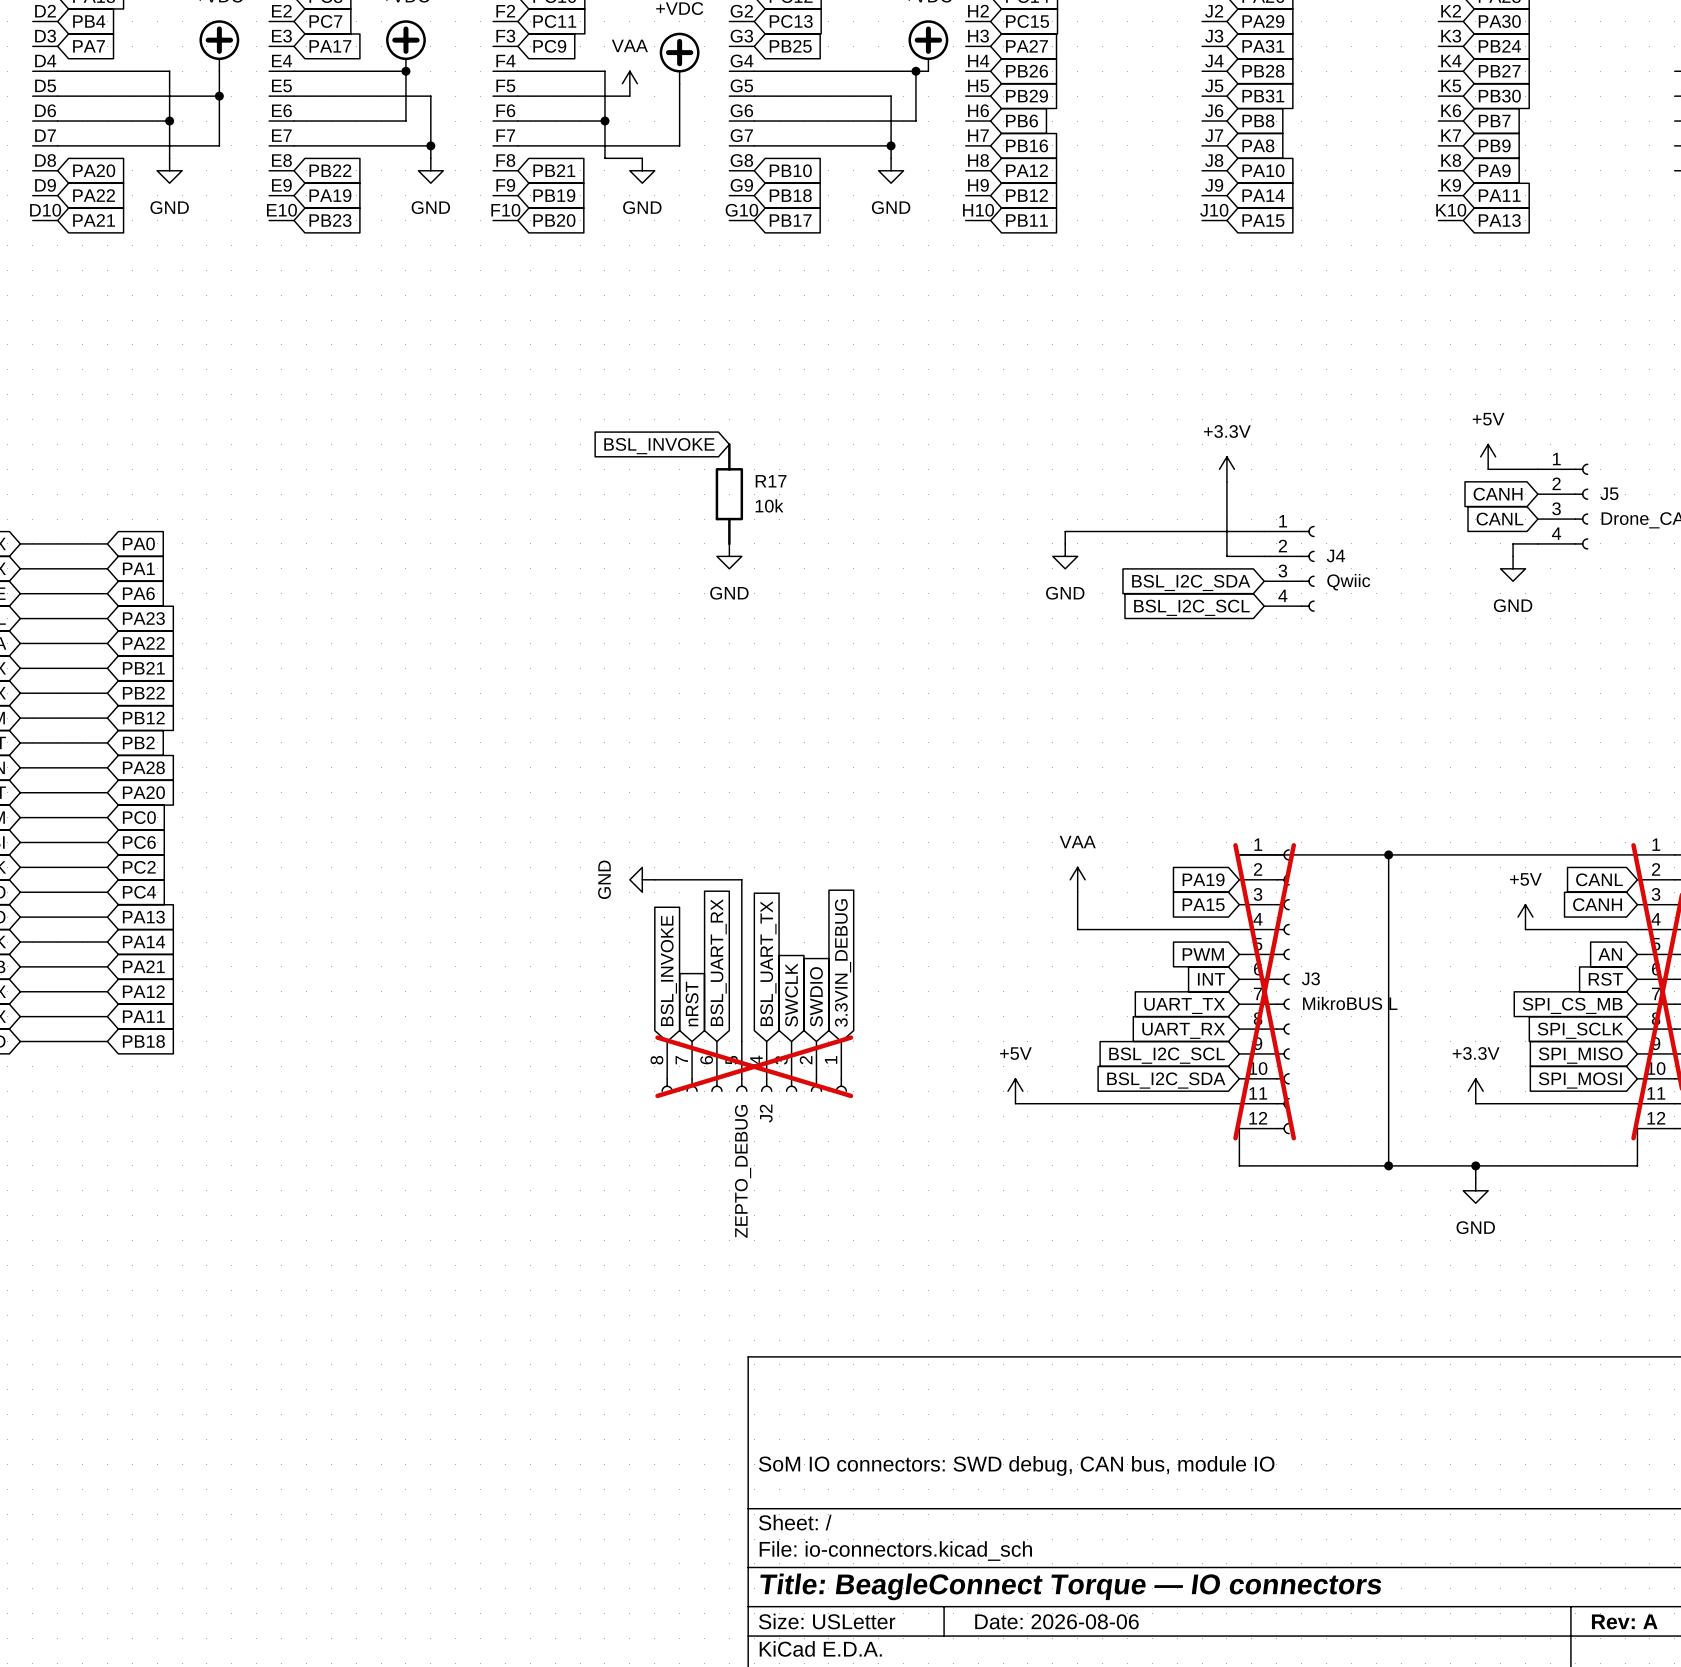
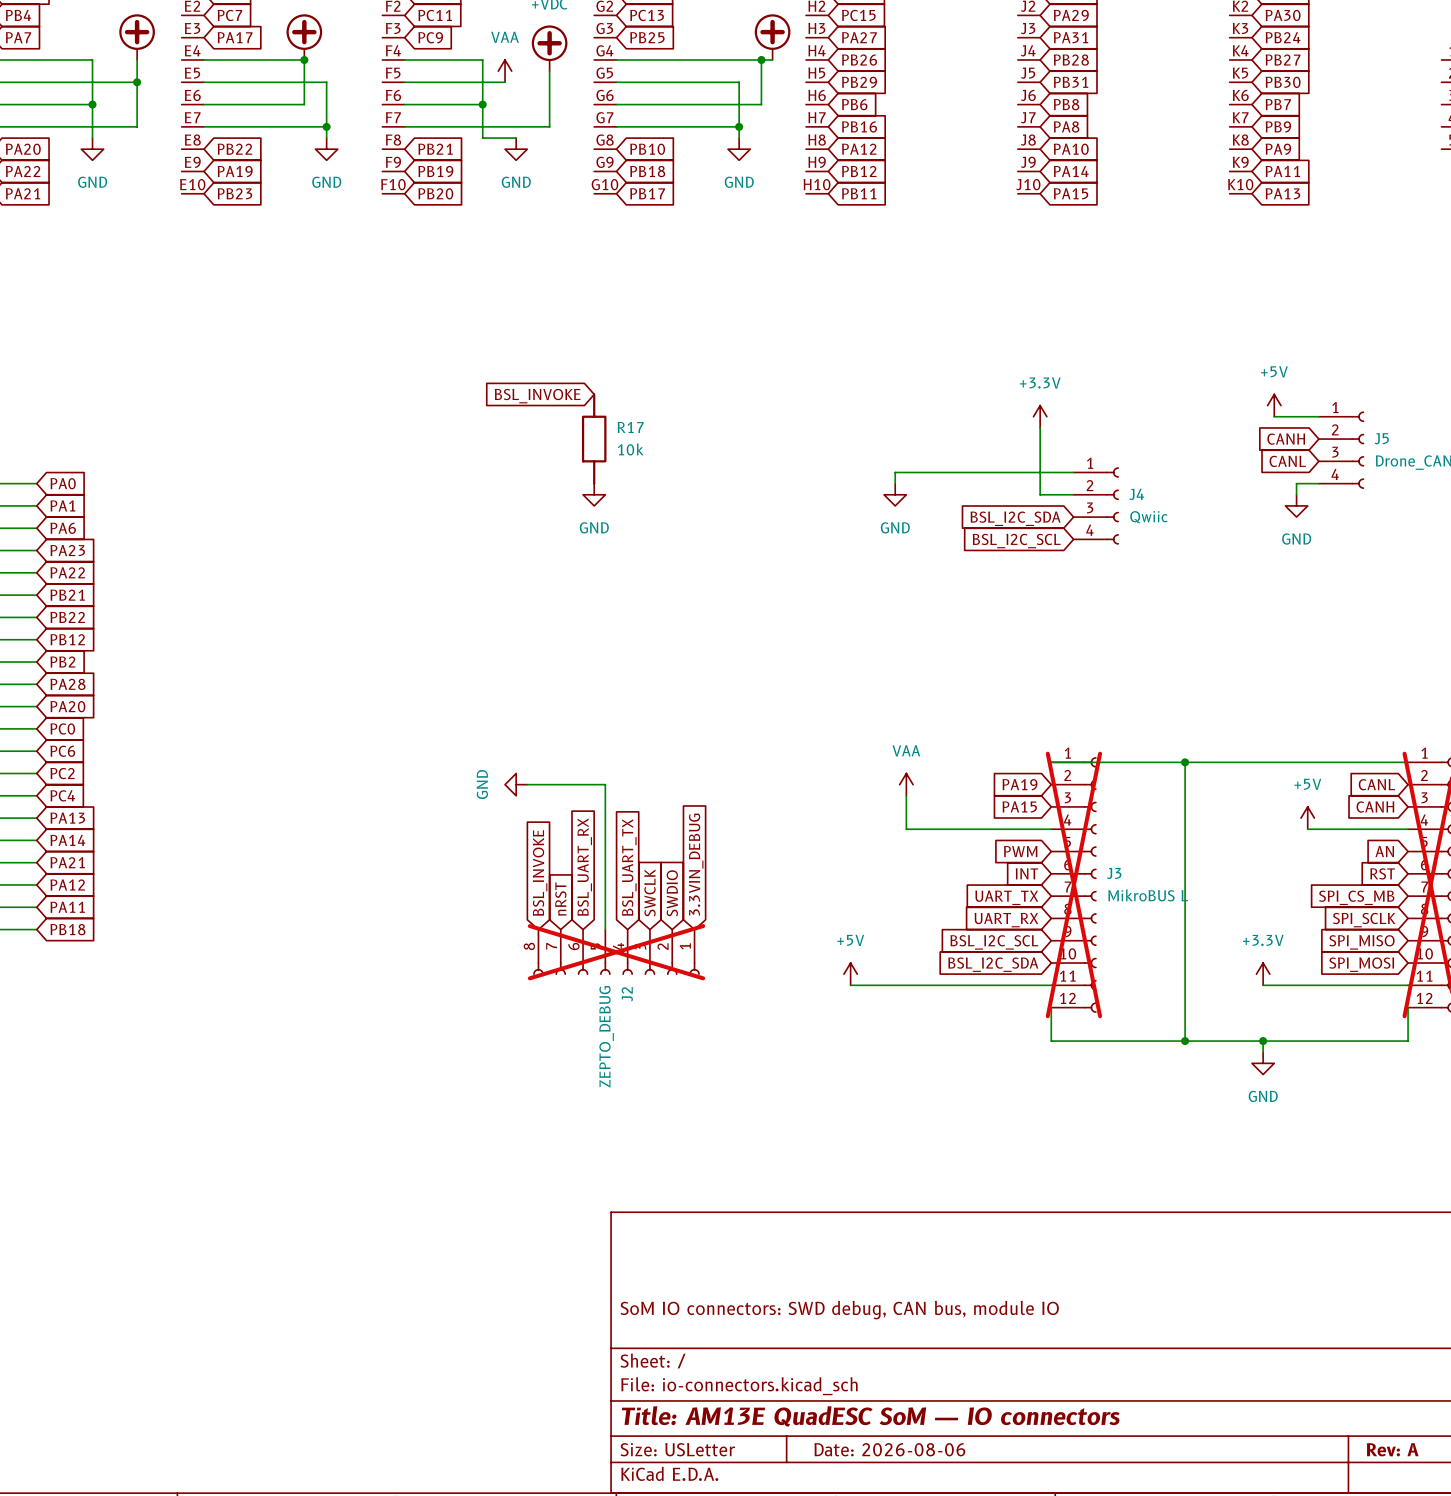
title block: Title: BeagleConnect Torque — IO connectors (1070, 1586) -> Title: AM13E QuadESC SoM — IO connectors (870, 1416)

